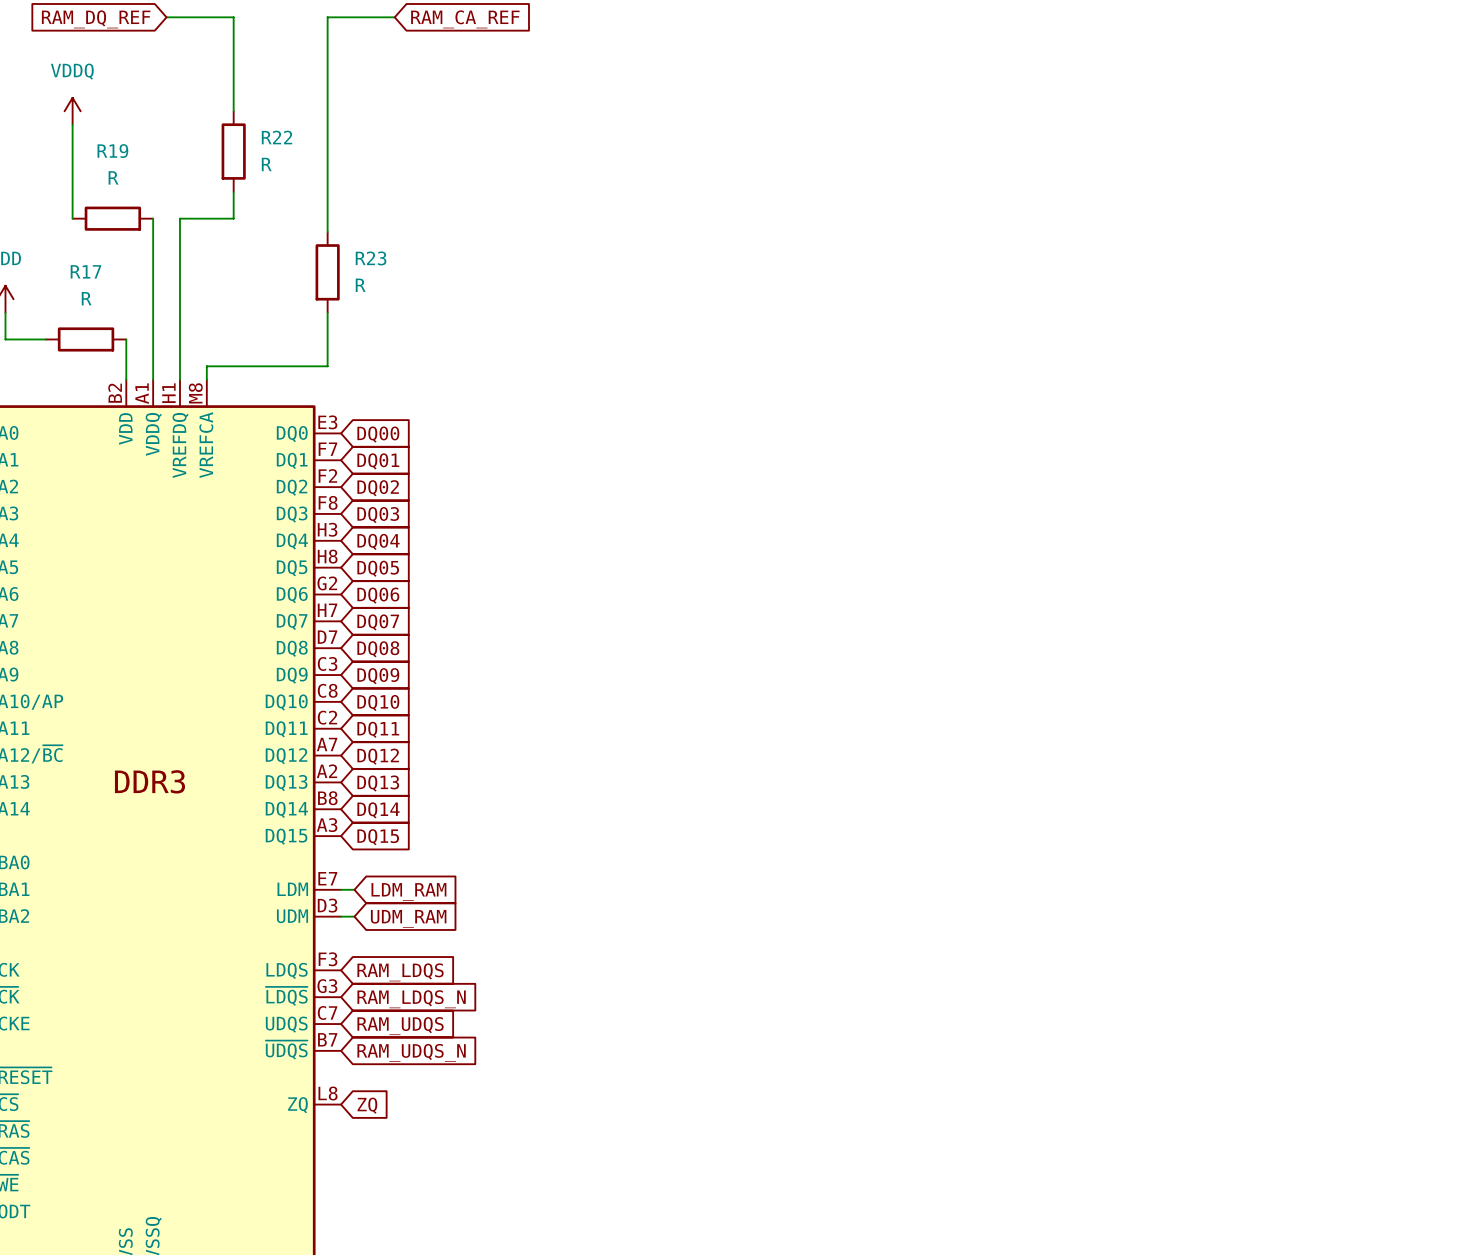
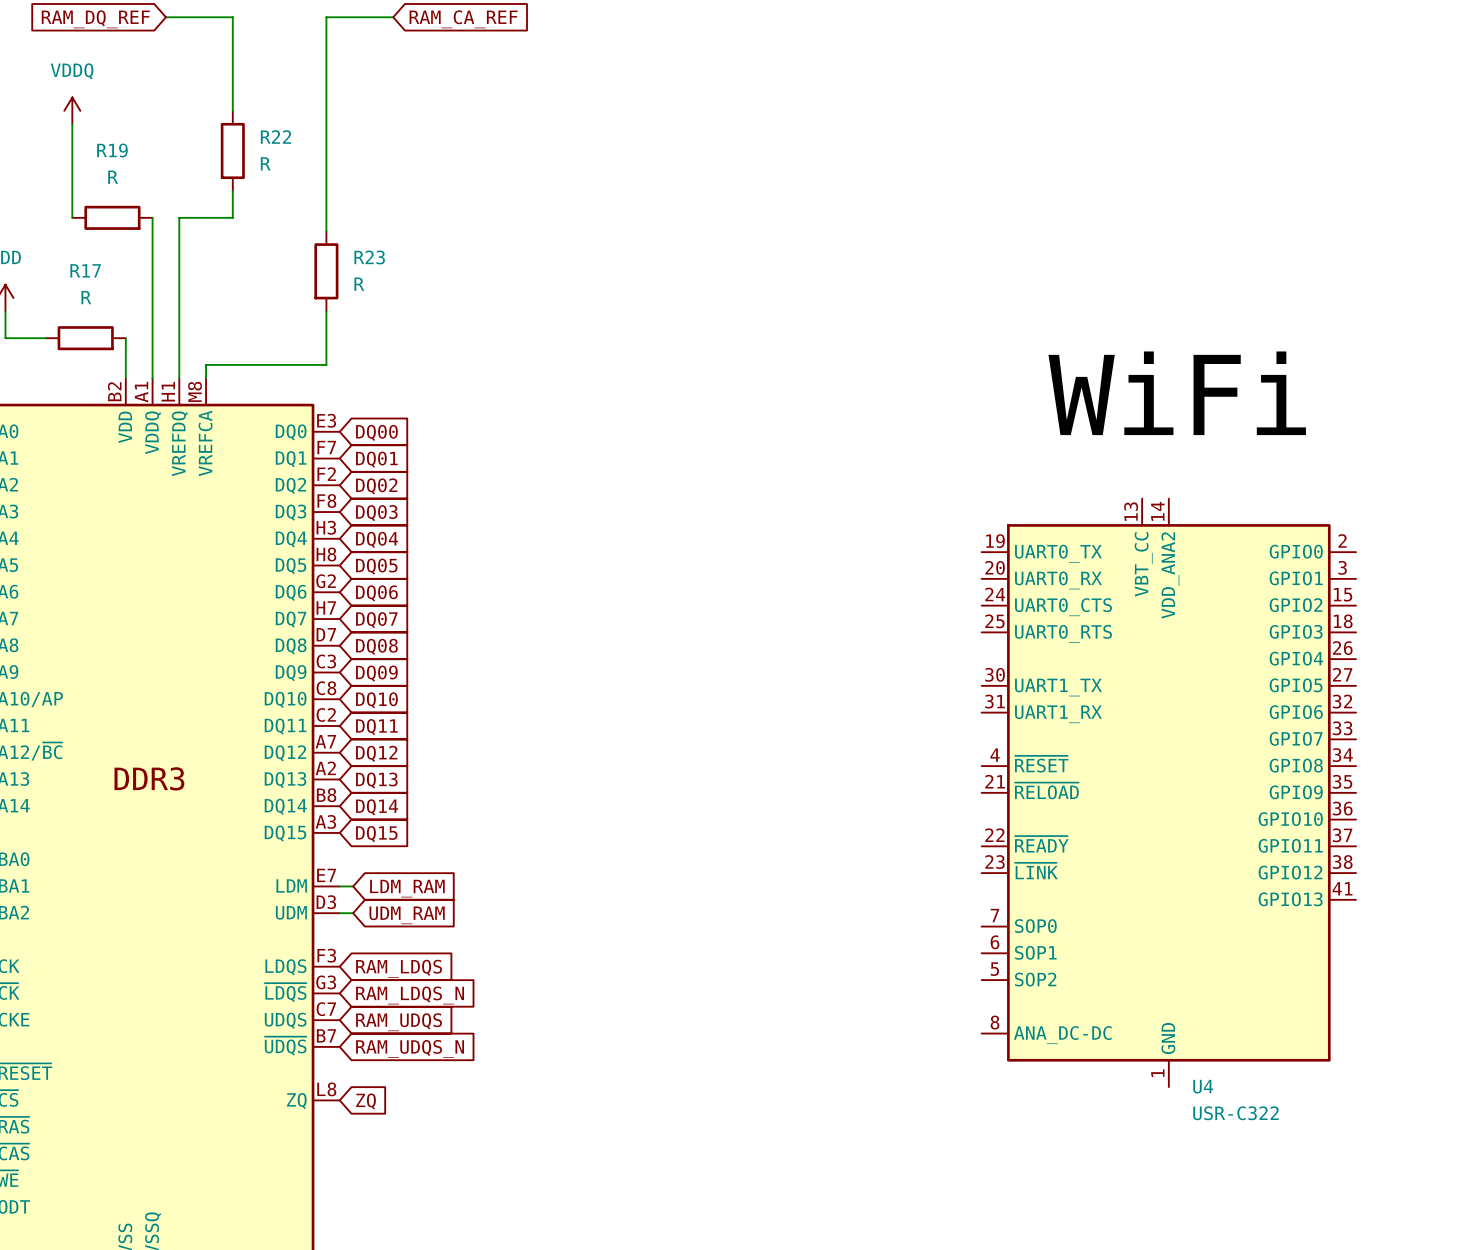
label: none -> WiFi (1177, 393)
U4: none -> USR-C322 (1168, 792)

